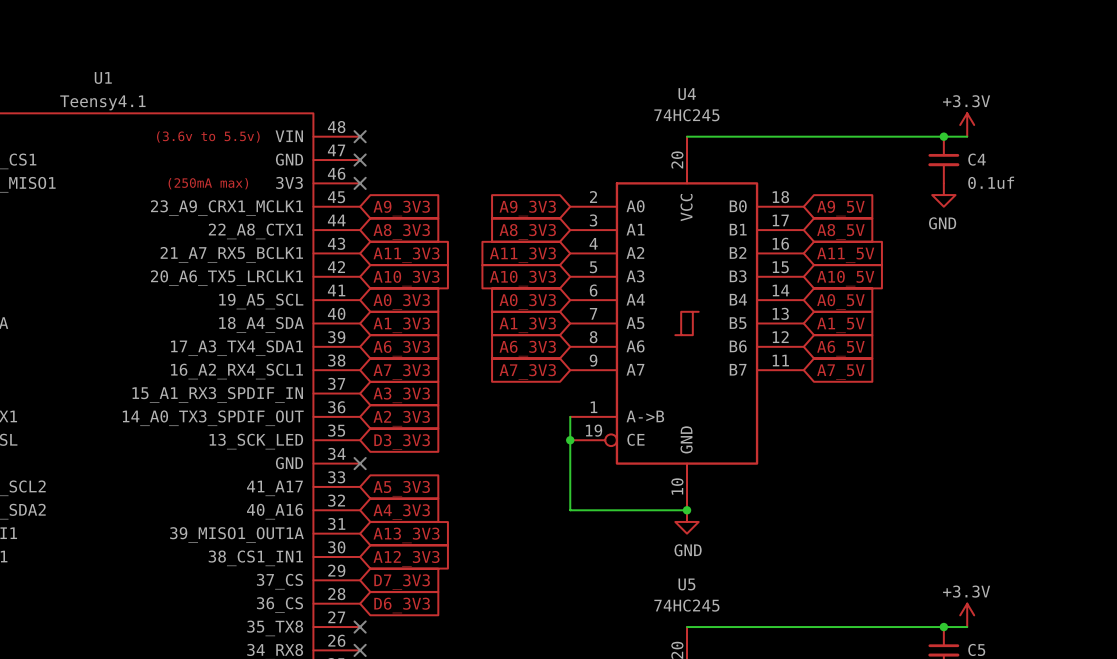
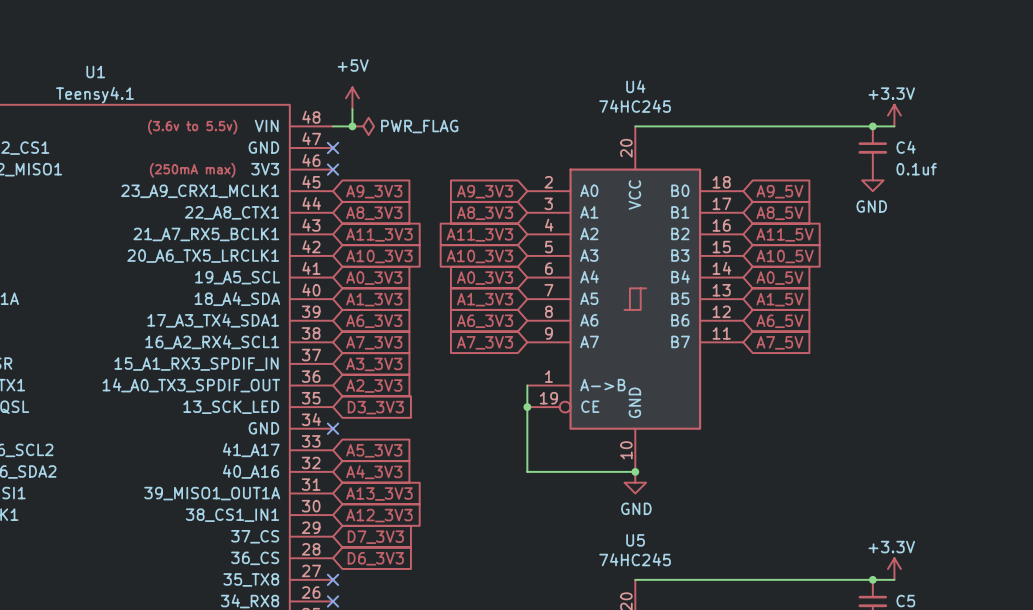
power symbol: none -> +5V (352, 98)
wire: none -> (352, 109) (352, 126) (333, 126)
no-connect mark: (360, 136) -> none
junction: none -> (352, 126)
power symbol: none -> PWR_FLAG (363, 126)

